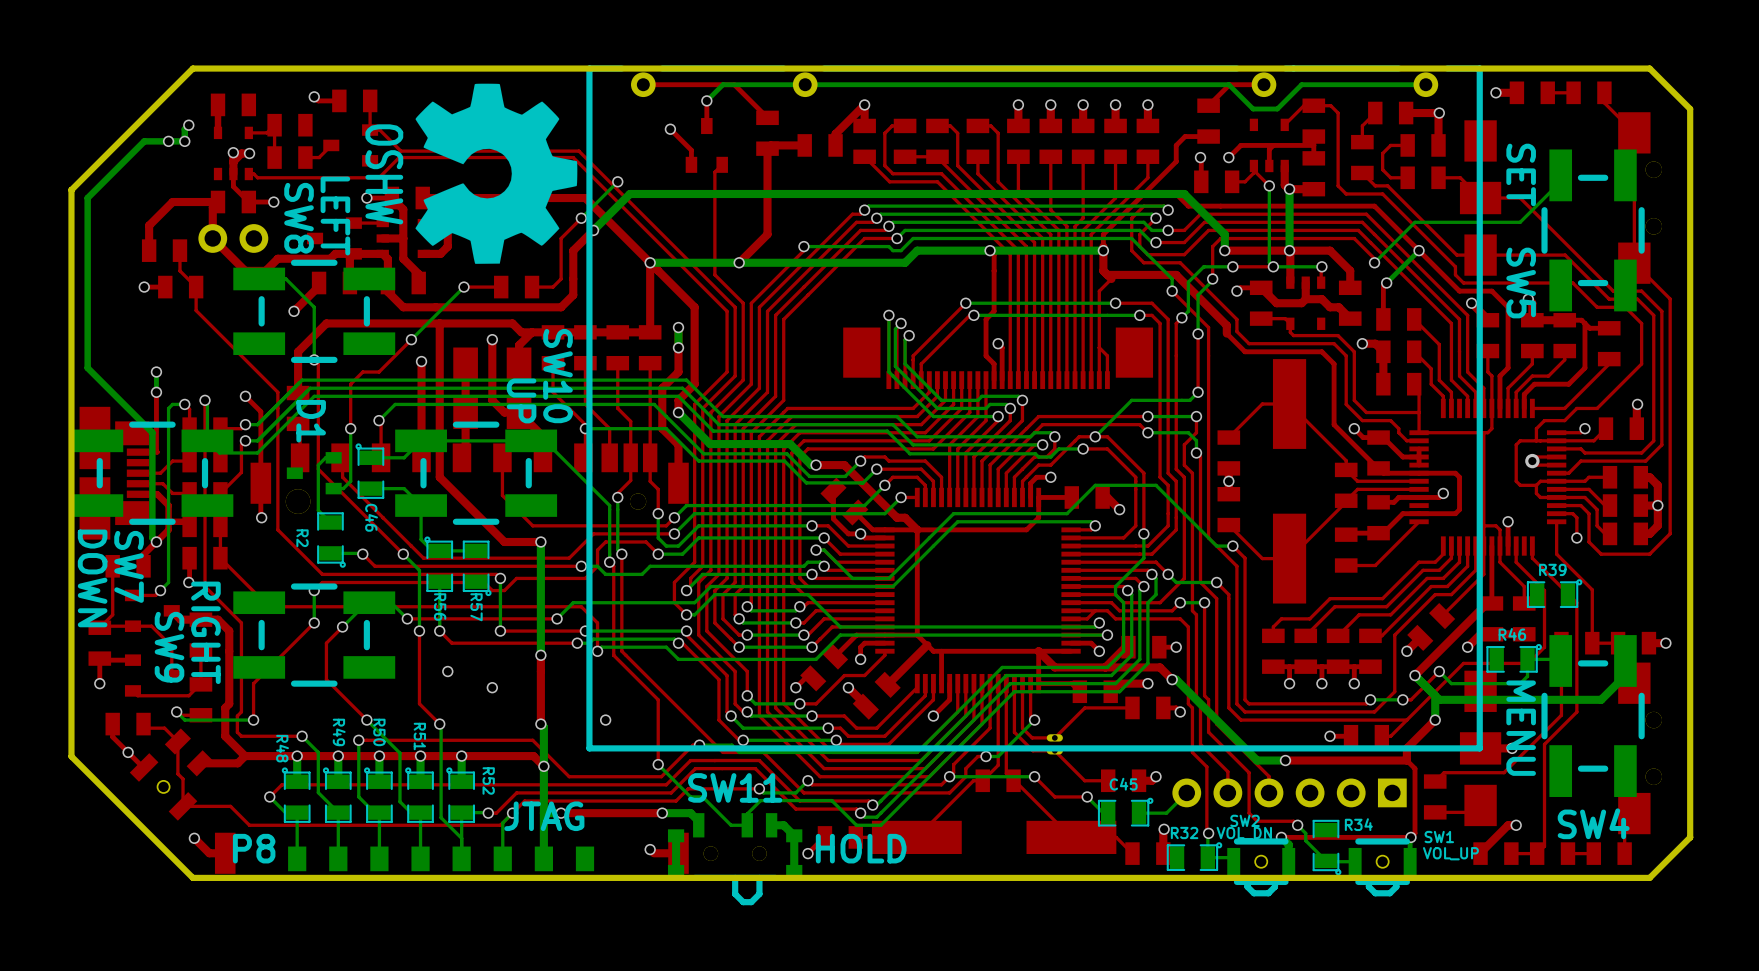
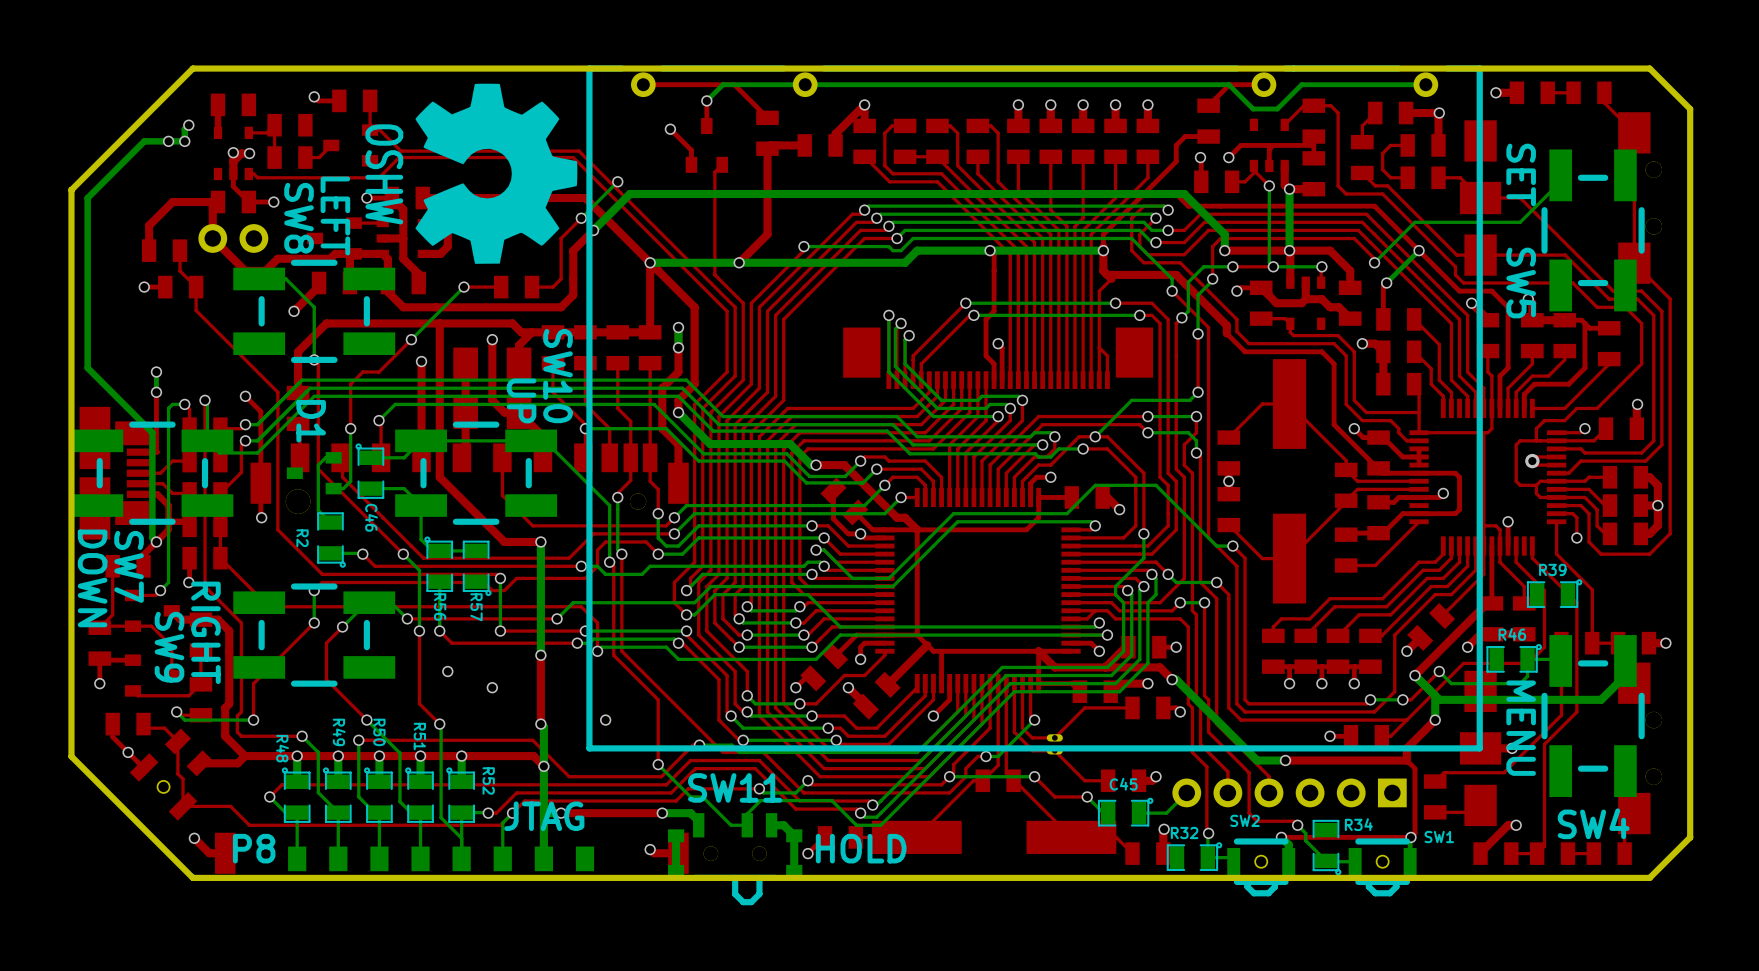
SW2 value: VOL_DN (1244, 833) -> none
SW1 value: VOL_UP (1450, 853) -> none

